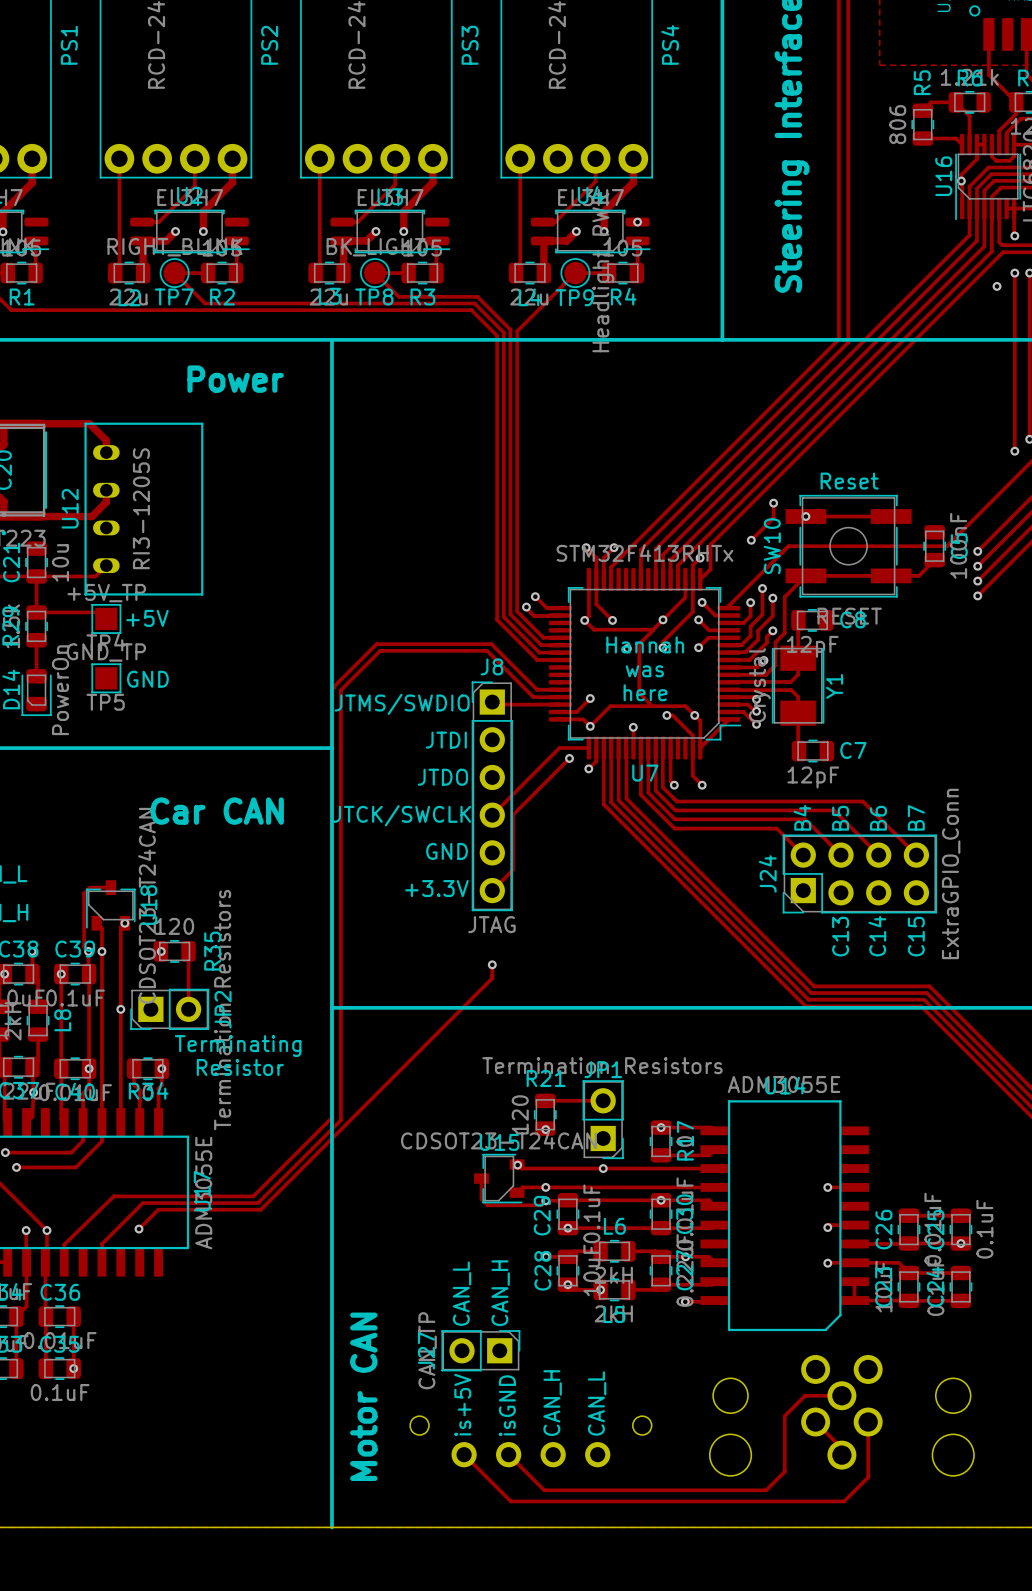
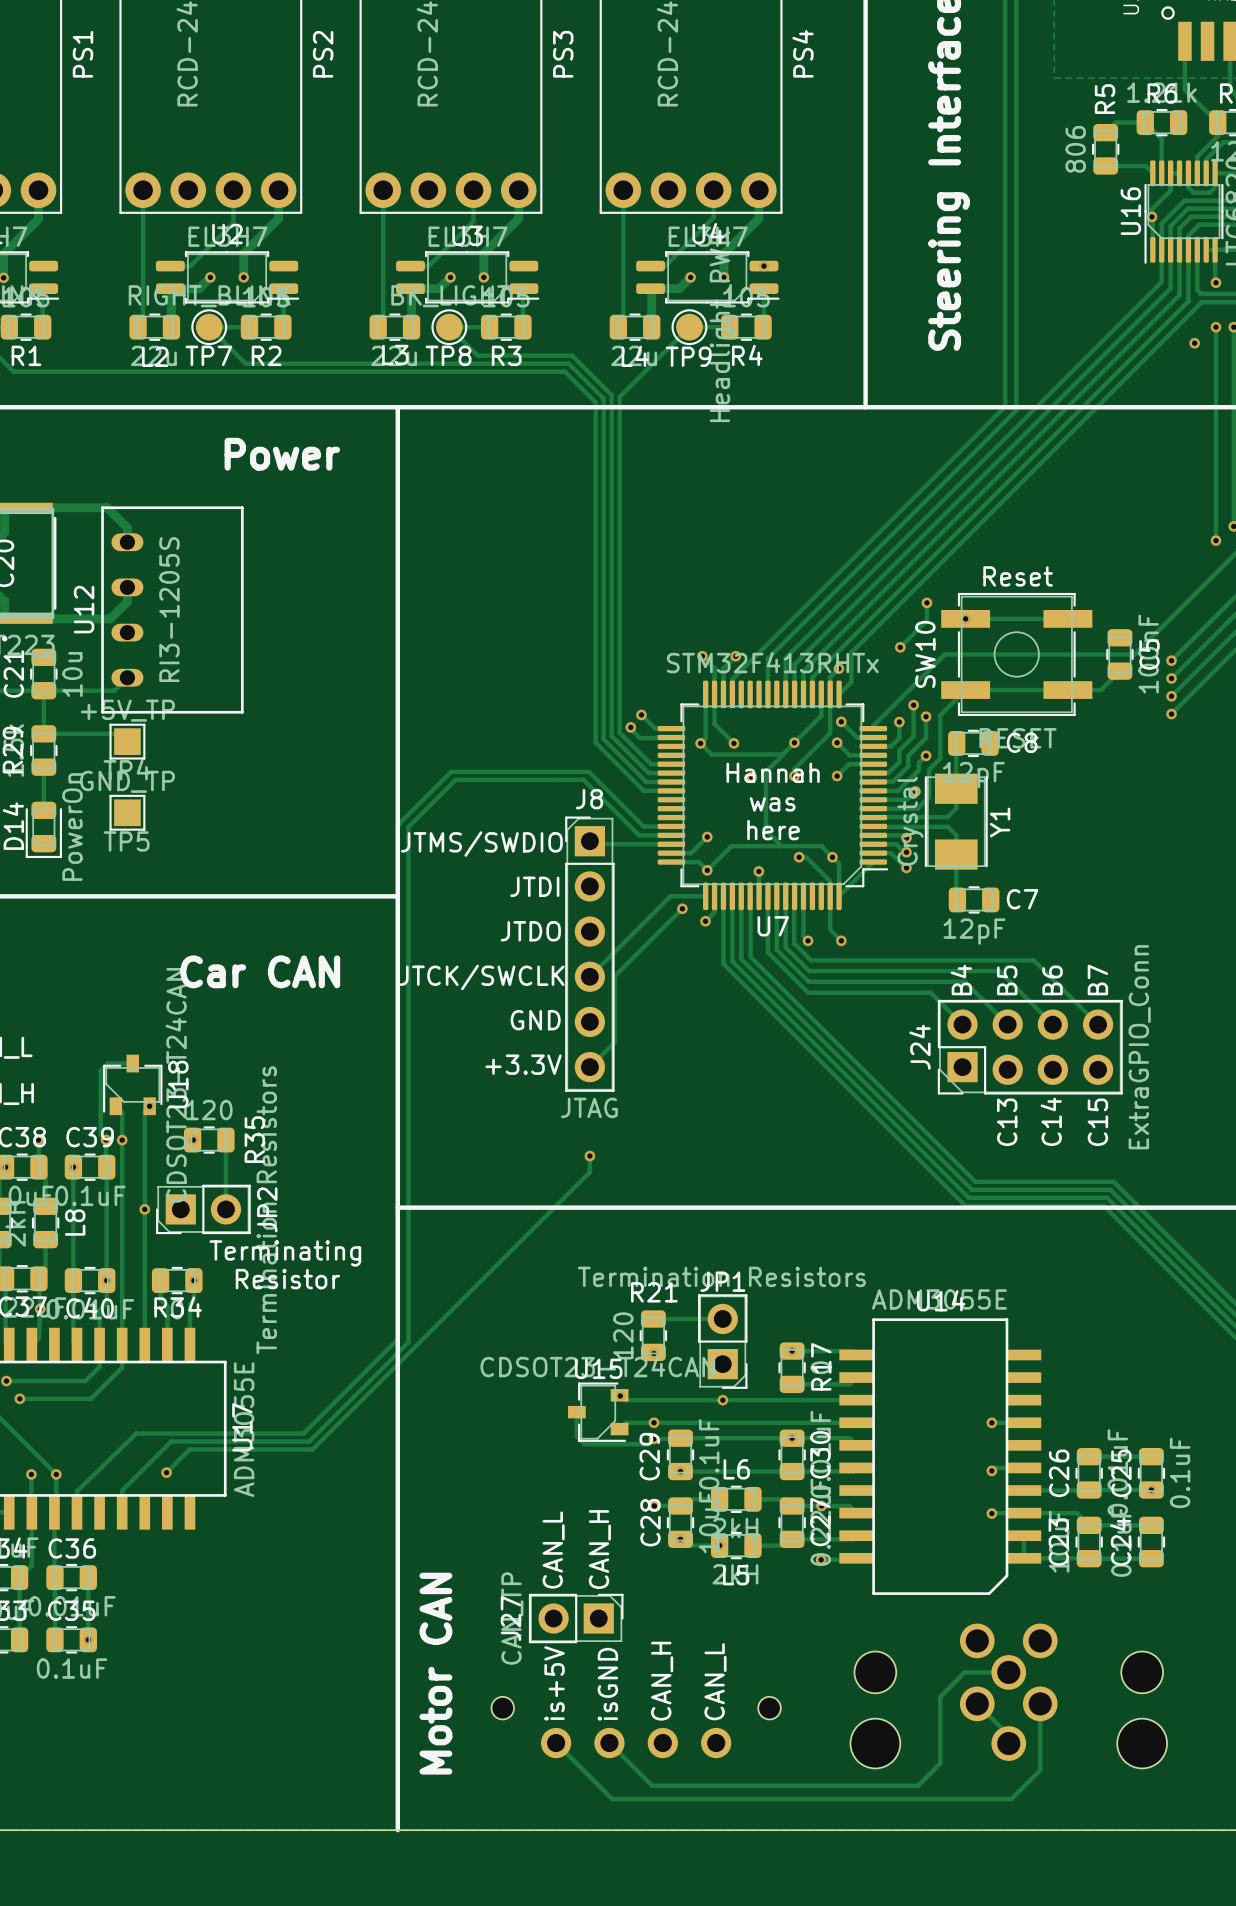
text: +5V (147, 618) -> none
text: GND (147, 679) -> none

